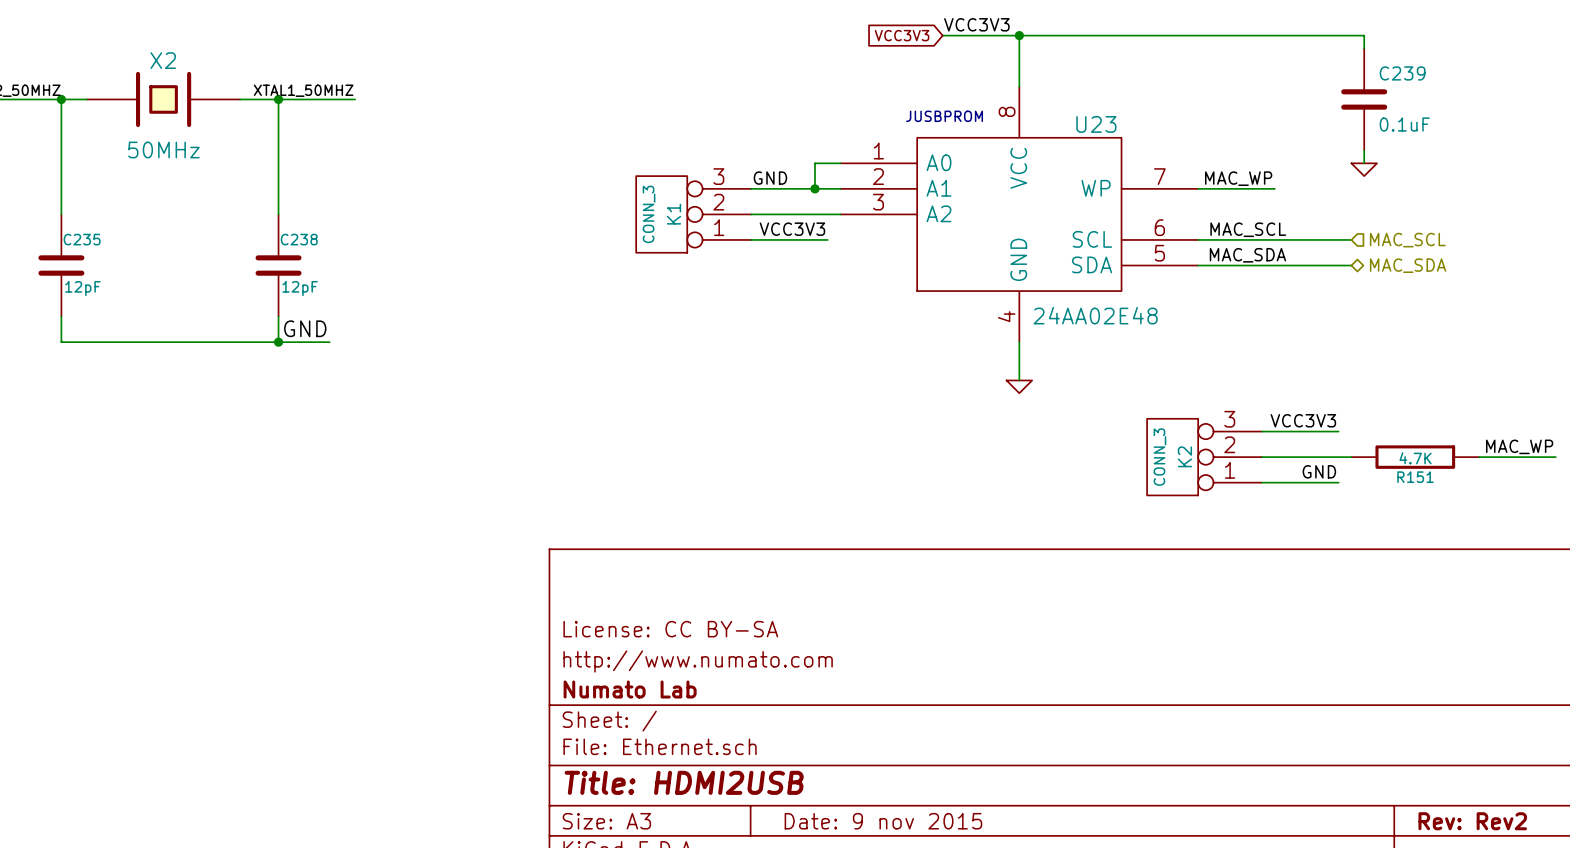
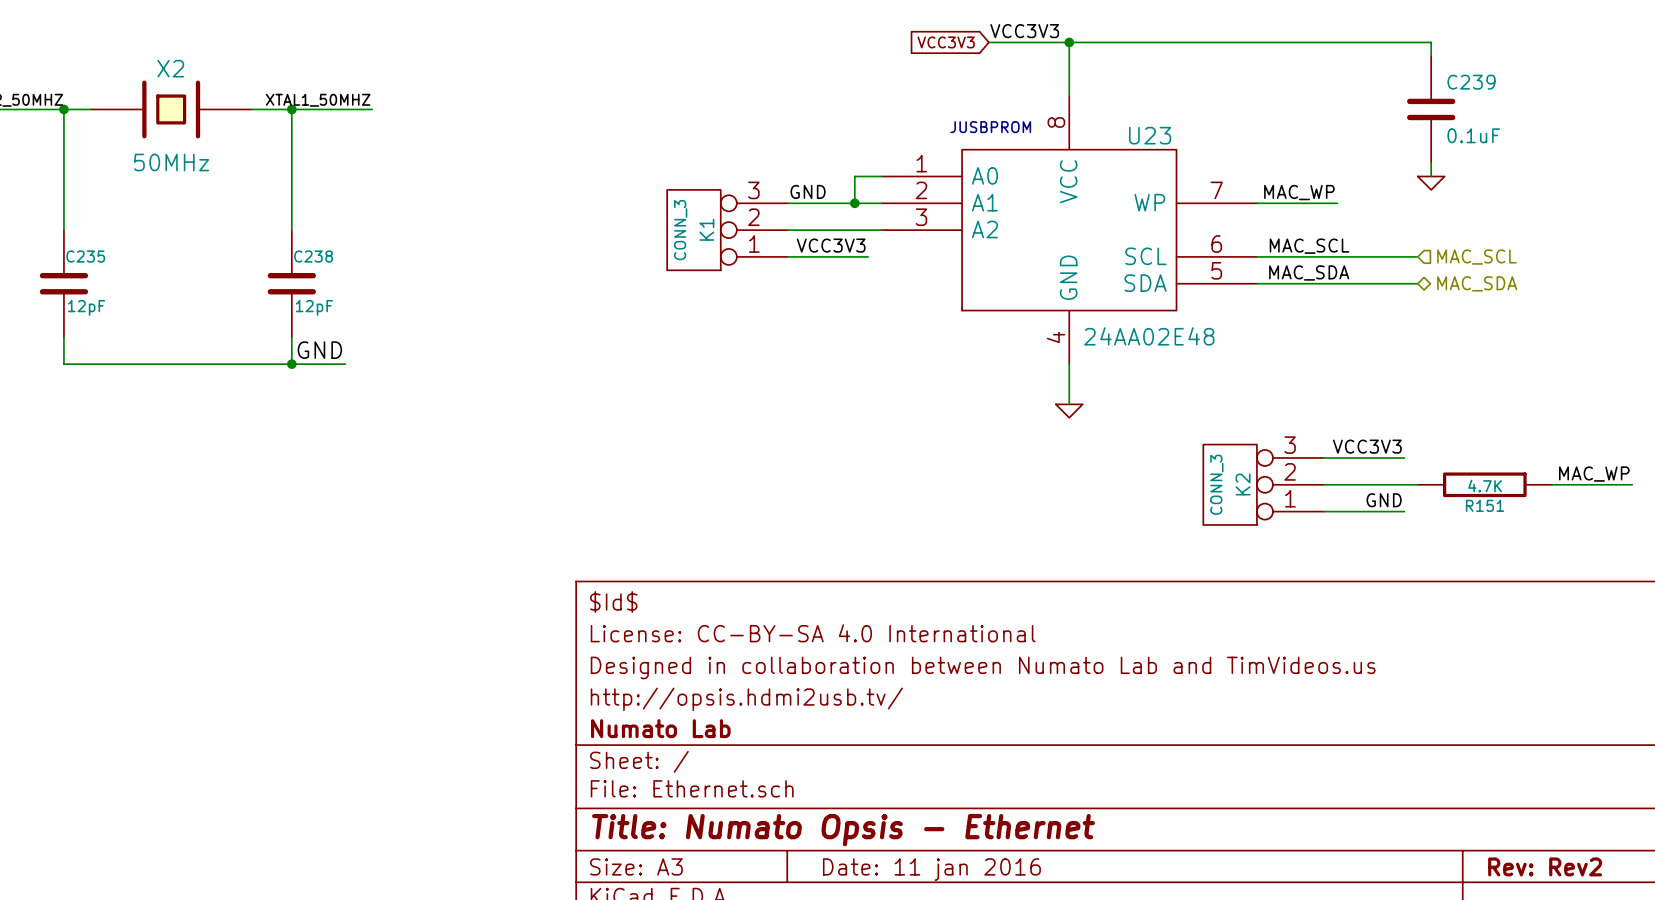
title block: none -> $Id$ (613, 602)
title block: none -> License: CC-BY-SA 4.0 International (813, 633)
title block: License: CC BY-SA (670, 629) -> Designed in collaboration between Numato Lab and TimVideos.us (983, 667)
title block: http://www.numato.com (698, 661) -> http://opsis.hdmi2usb.tv/ (746, 699)
title block: Title: HDMI2USB (684, 782) -> Title: Numato Opsis - Ethernet (843, 830)
title block: Date: 9 nov 2015 (883, 821) -> Date: 11 jan 2016 (931, 869)

